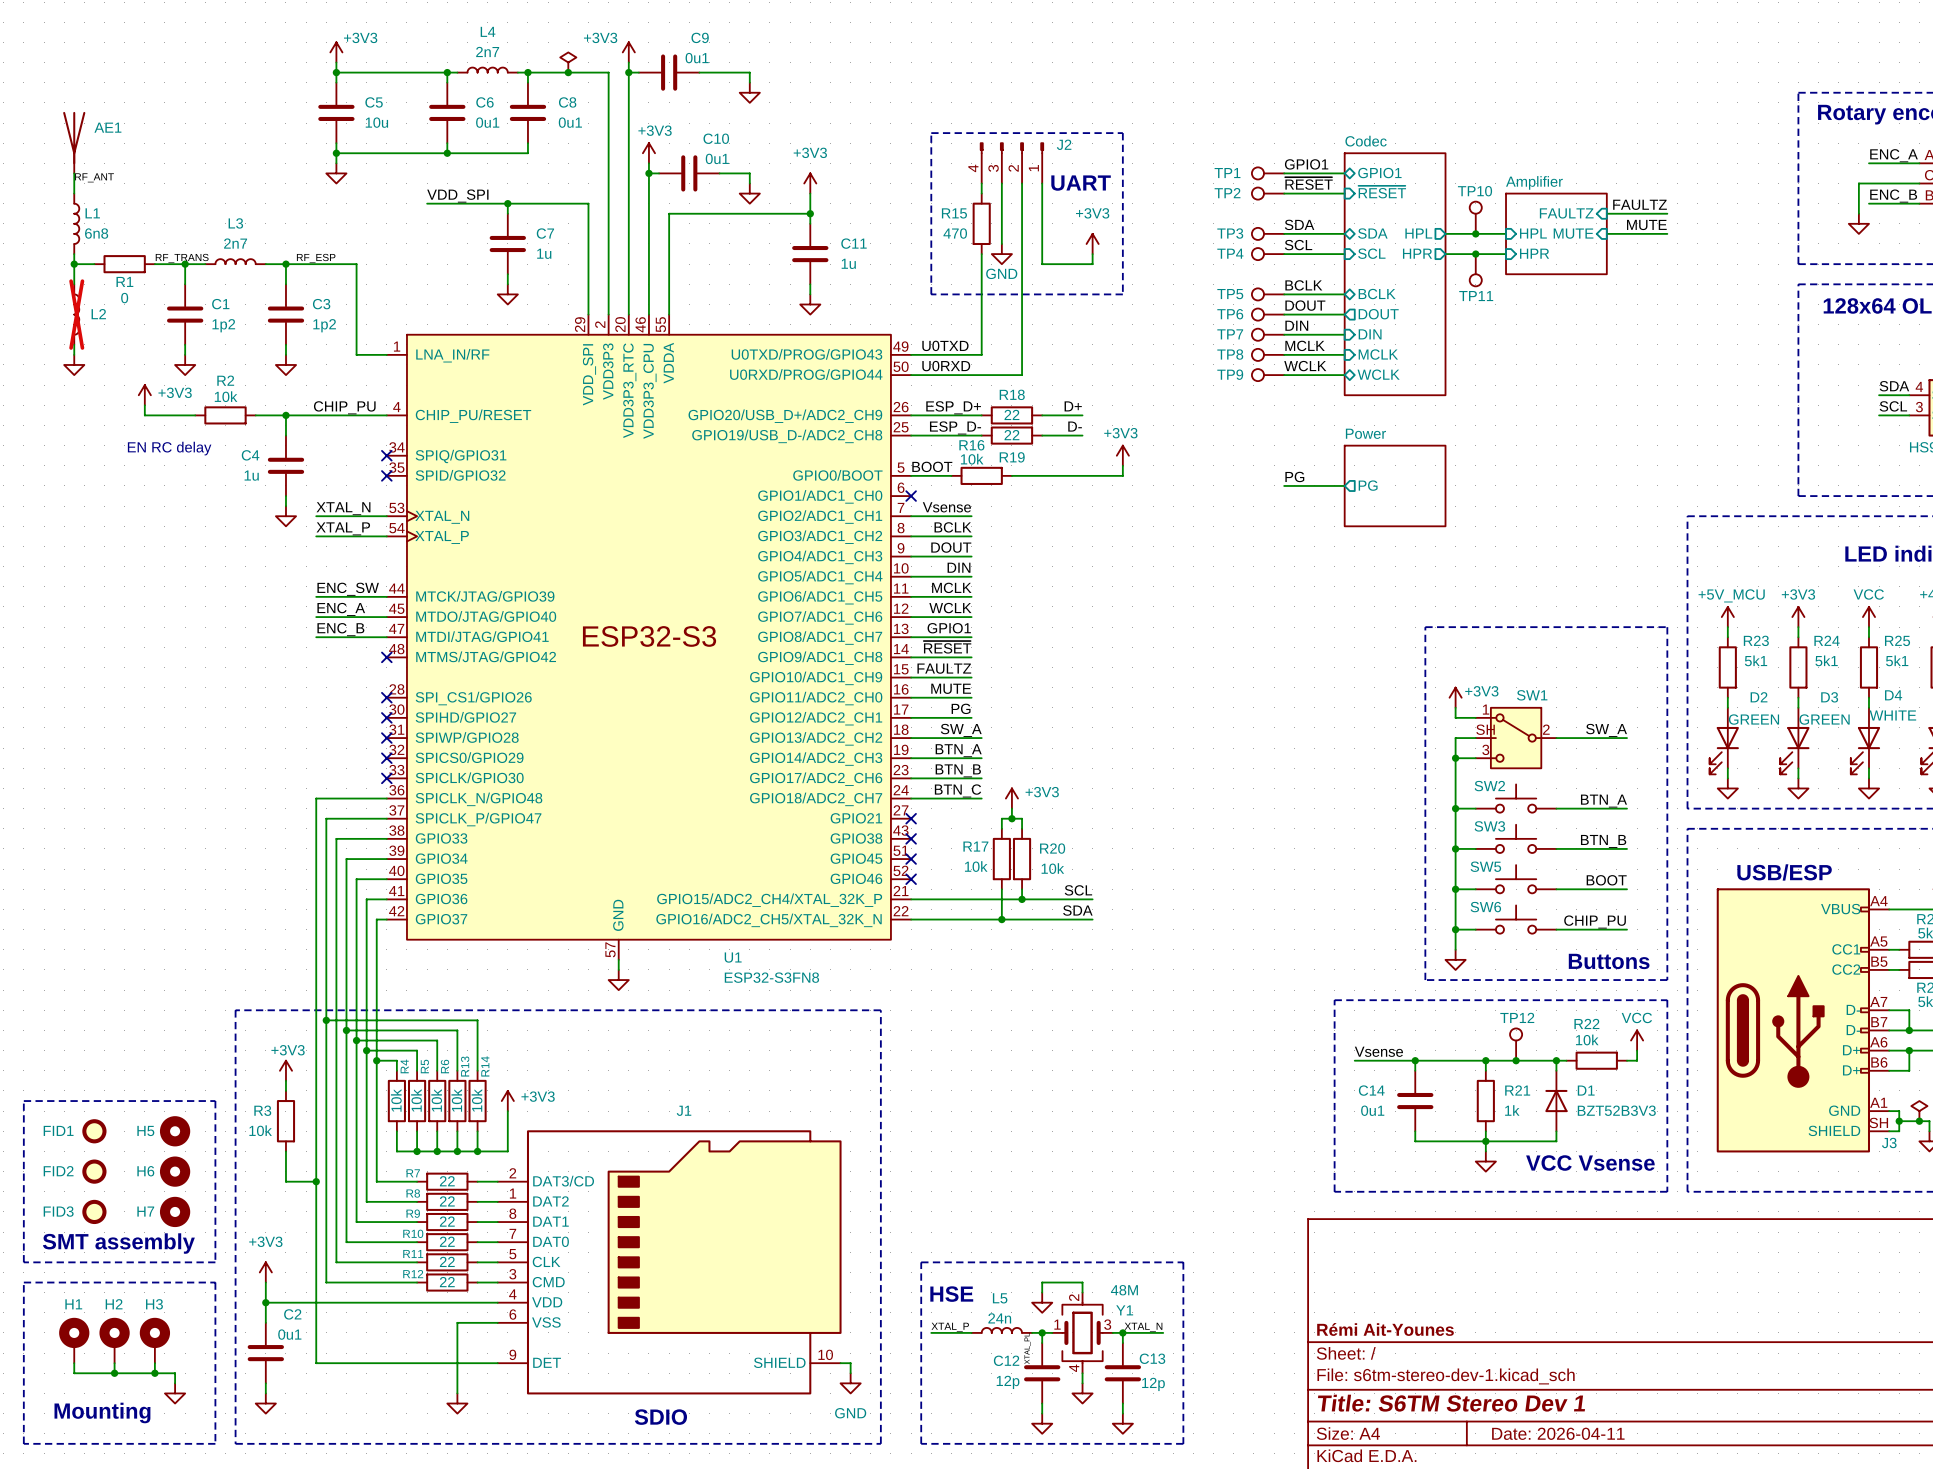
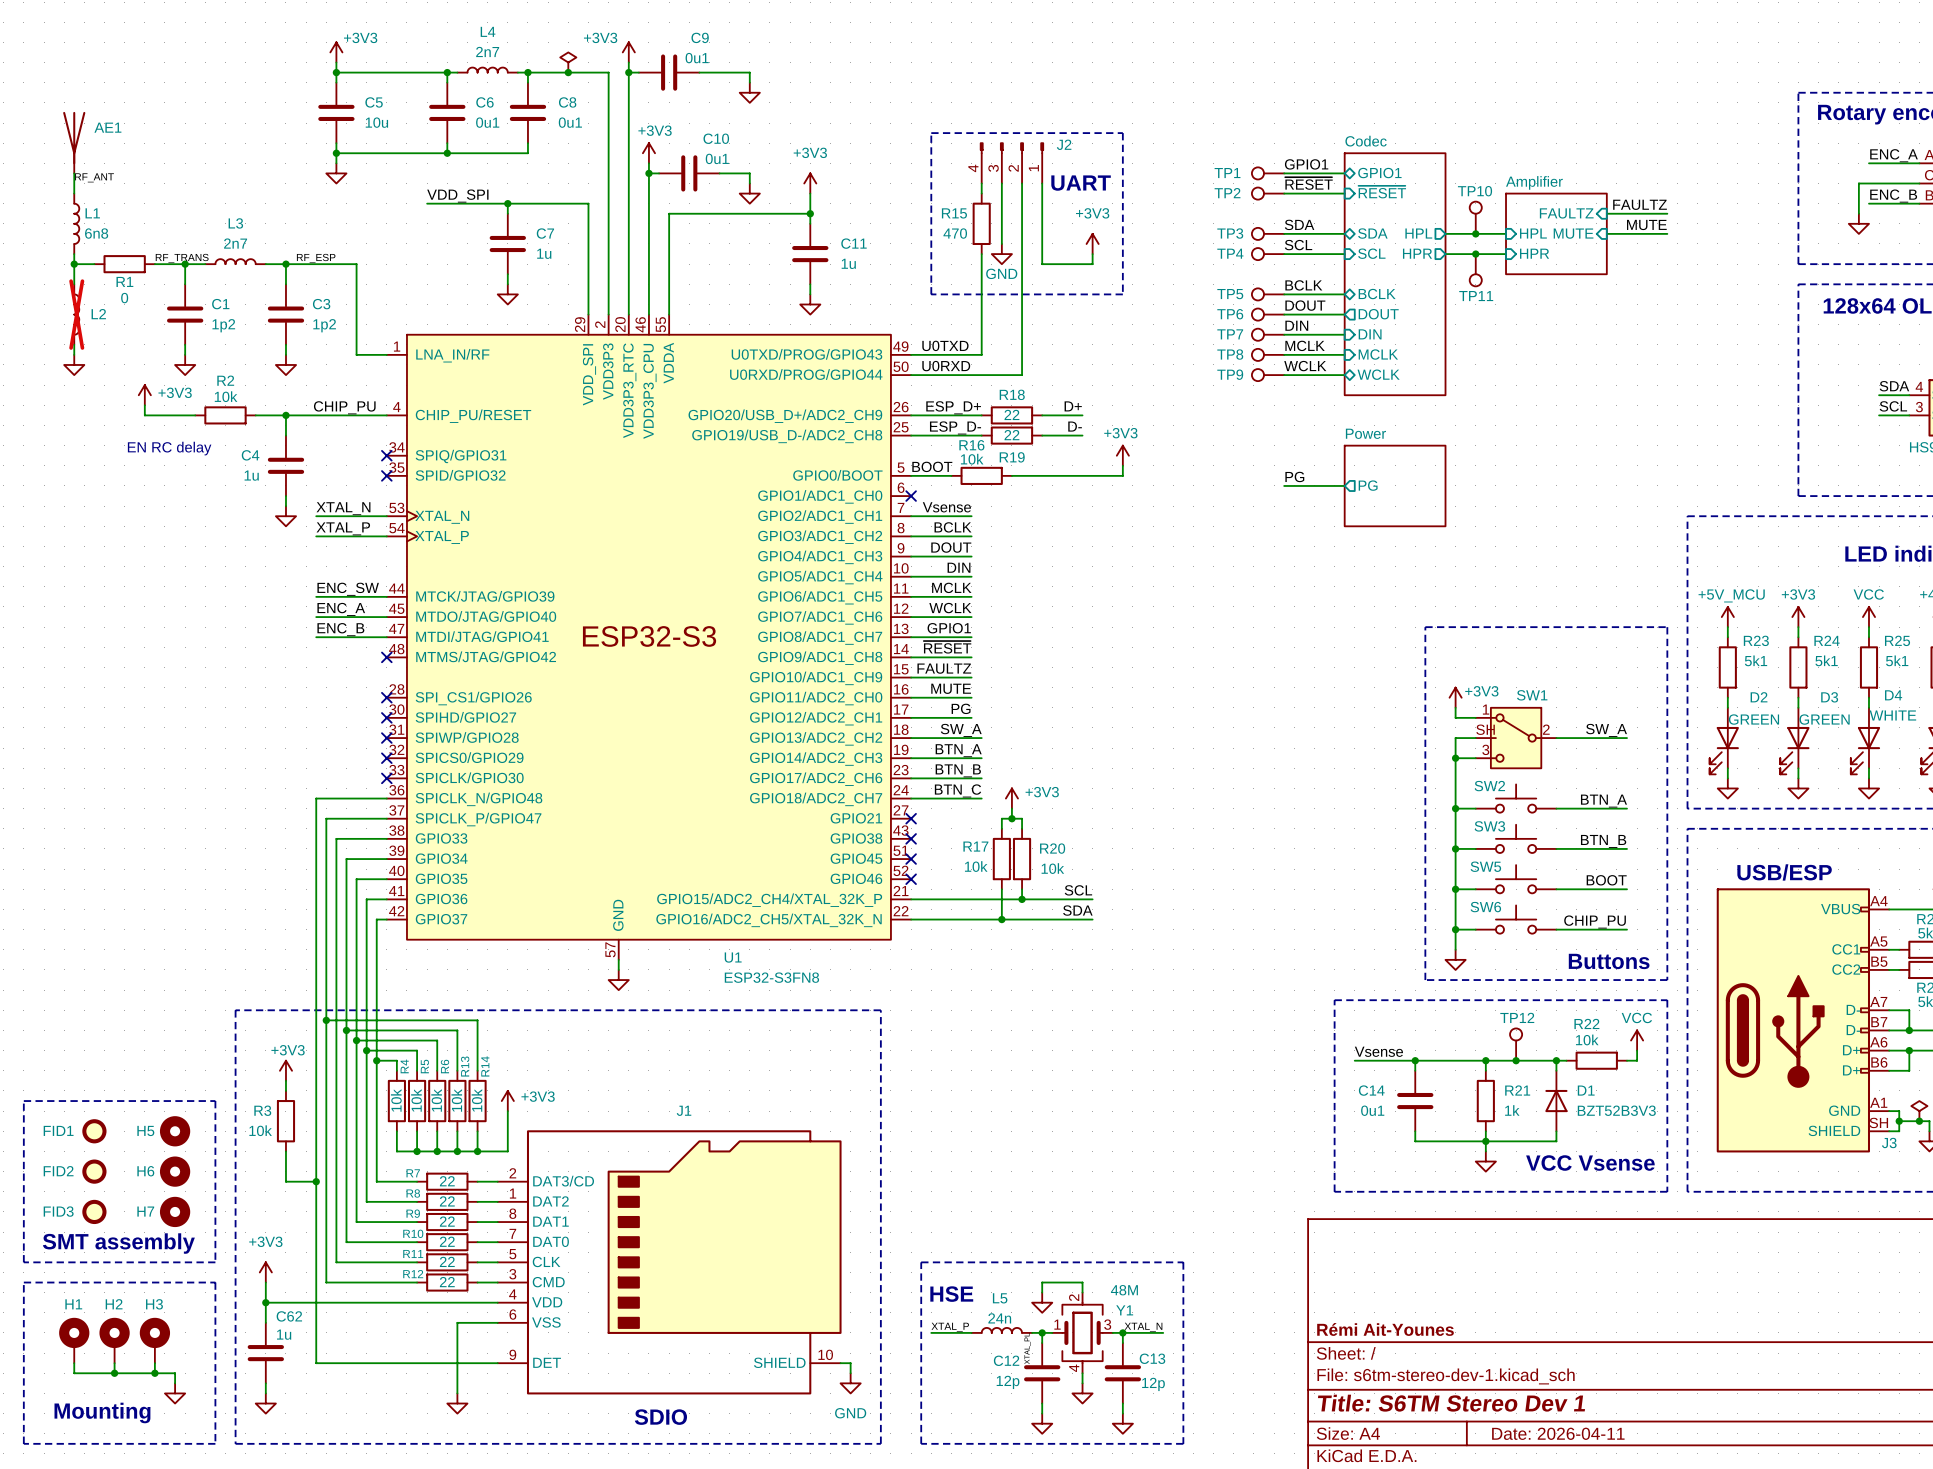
C2 name: C2 (292, 1314) -> C62 (289, 1316)
C2 value: 0u1 (289, 1334) -> 1u (284, 1334)

